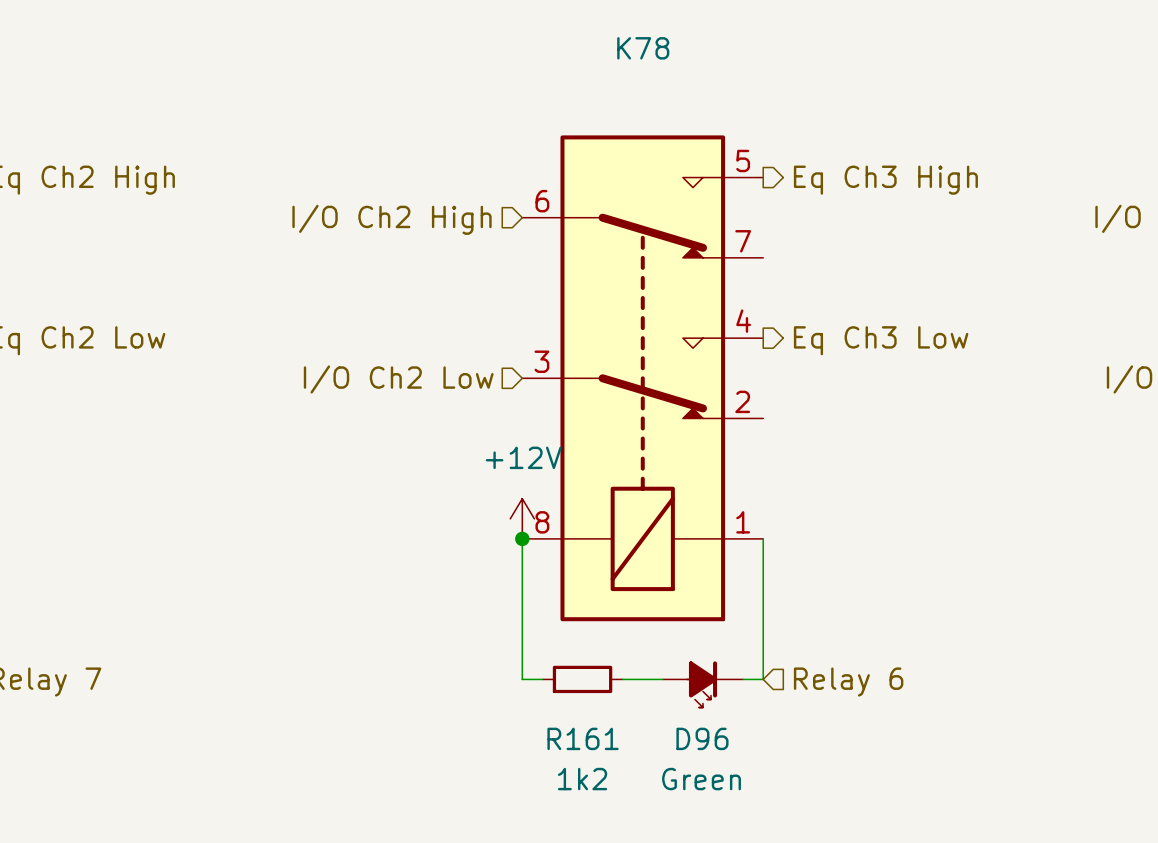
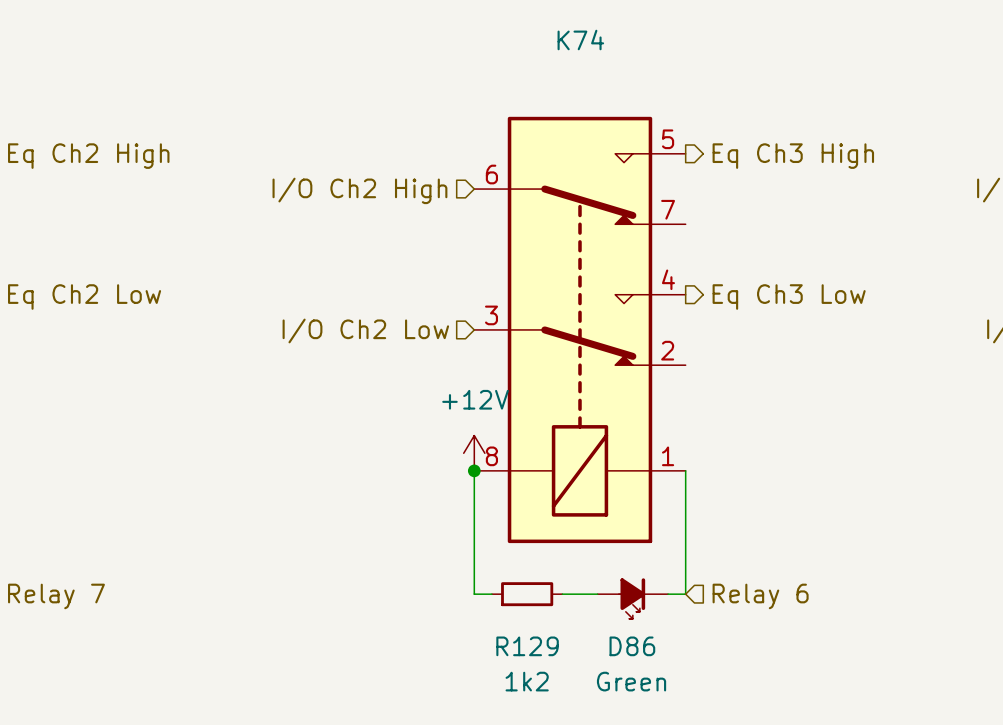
K78 name: K78 (643, 48) -> K74 (580, 40)
R161 name: R161 (583, 738) -> R129 (527, 646)
D96 name: D96 (702, 738) -> D86 (632, 646)

